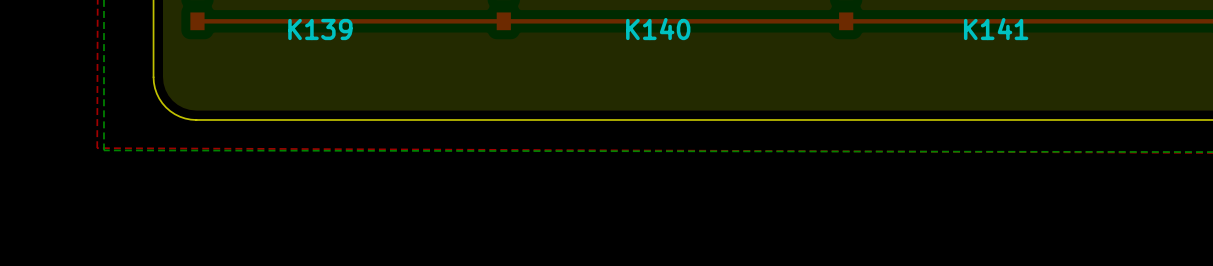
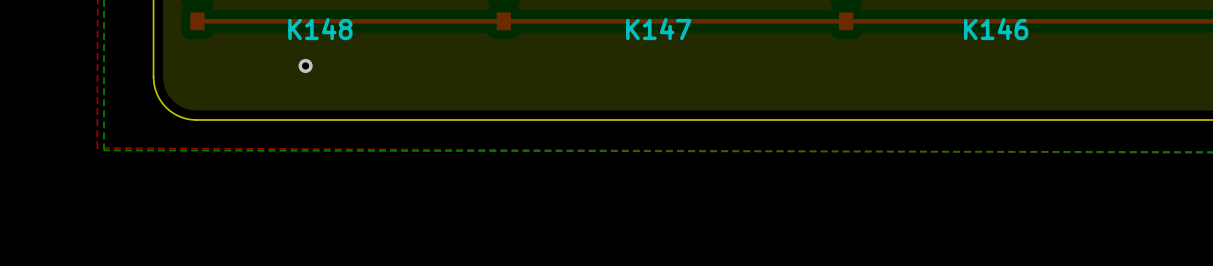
K139 name: K139 (320, 29) -> K148 (320, 29)
K140 name: K140 (658, 29) -> K147 (658, 29)
K141 name: K141 (996, 29) -> K146 (996, 29)
via: none -> (305, 65)

